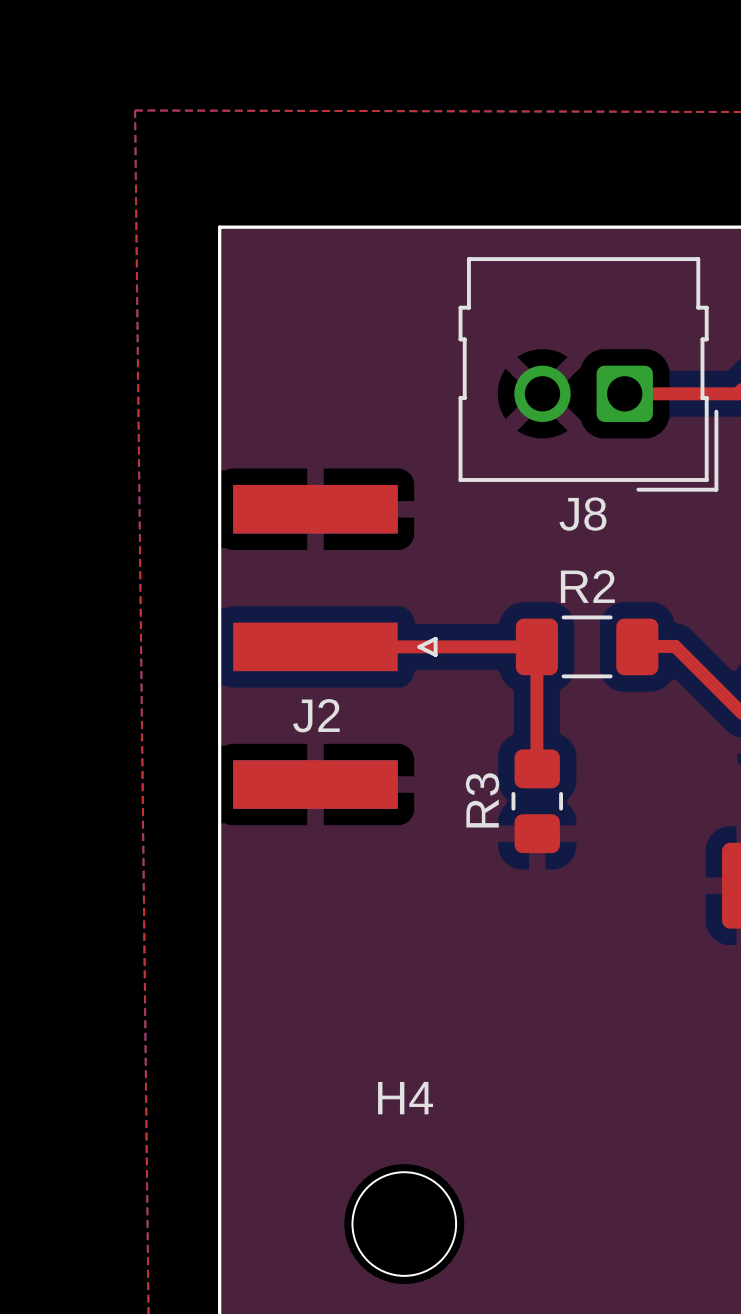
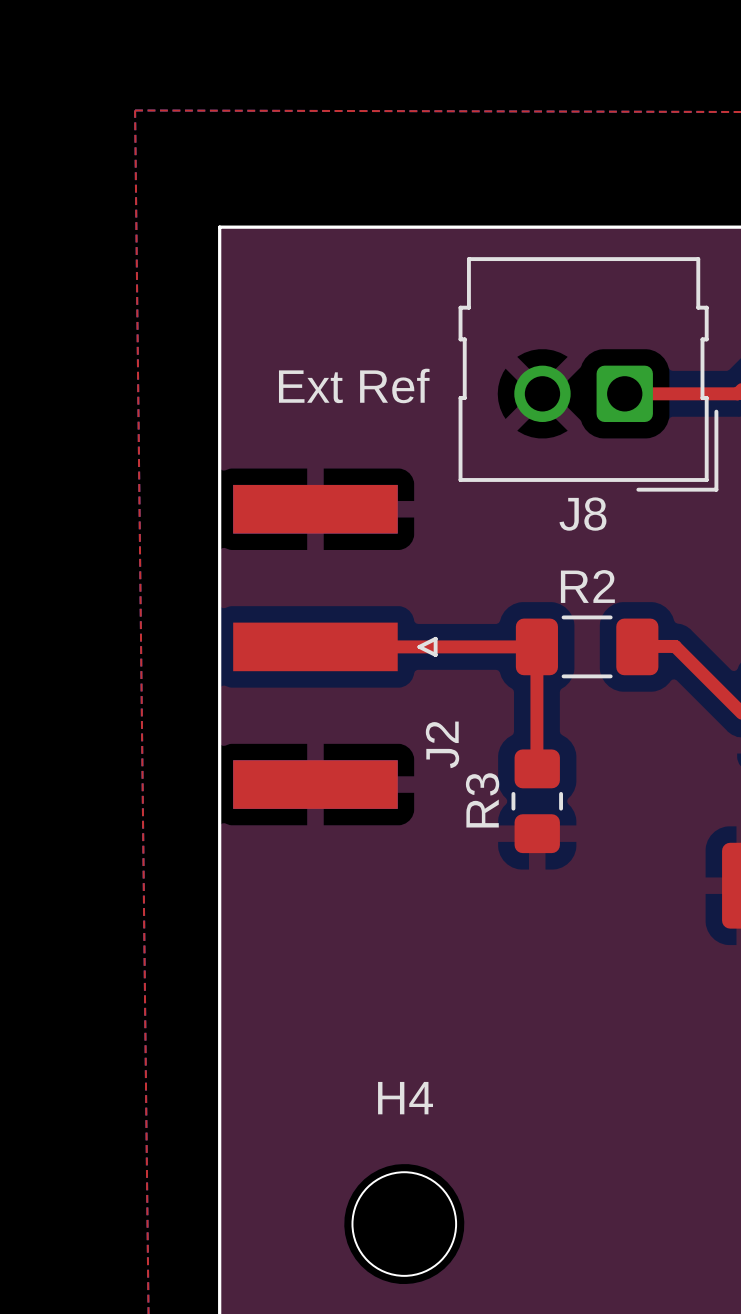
text: none -> Ext Ref (354, 385)
J2 name rotation: 0° (316, 715) -> 90° counterclockwise (442, 744)
J2 name position: J2 (316, 715) -> J2 (442, 744)

